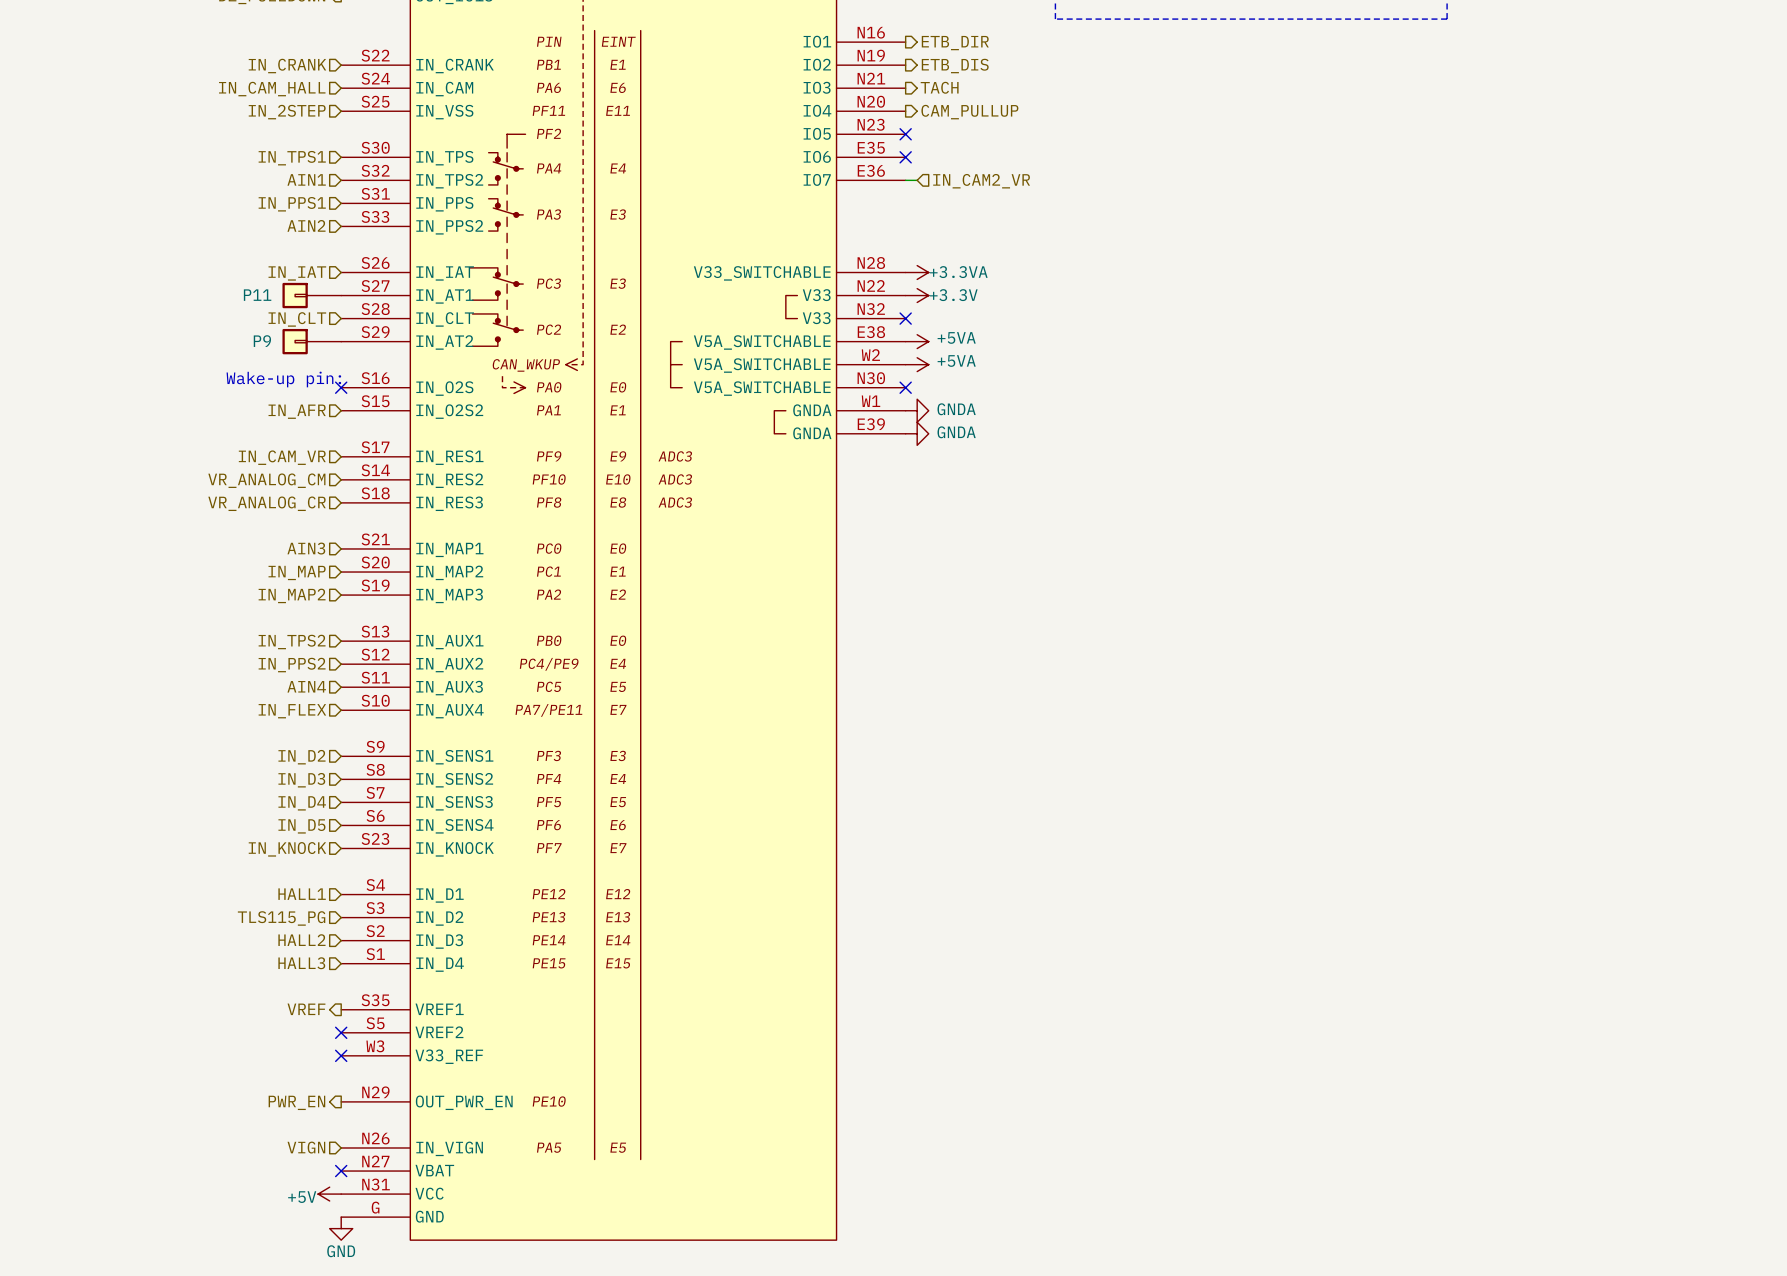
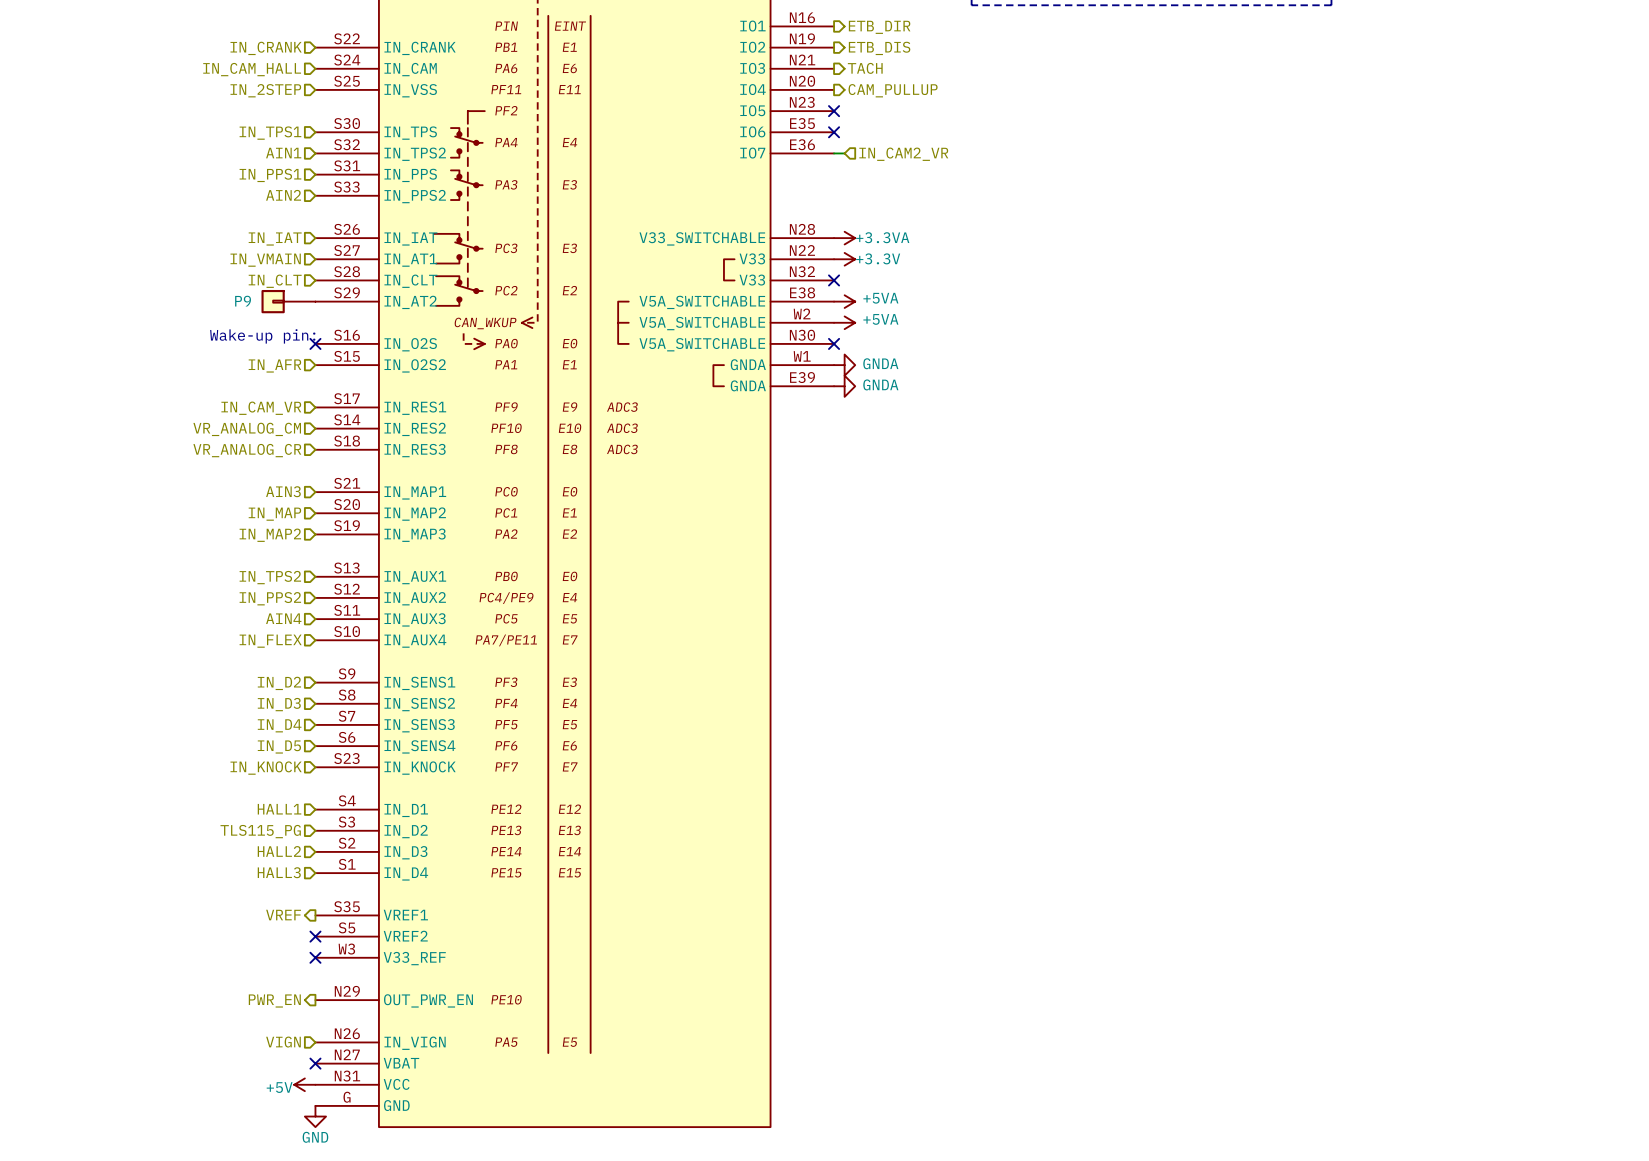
P11: (311, 295) -> none
hierarchical label: none -> IN_VMAIN (265, 260)

